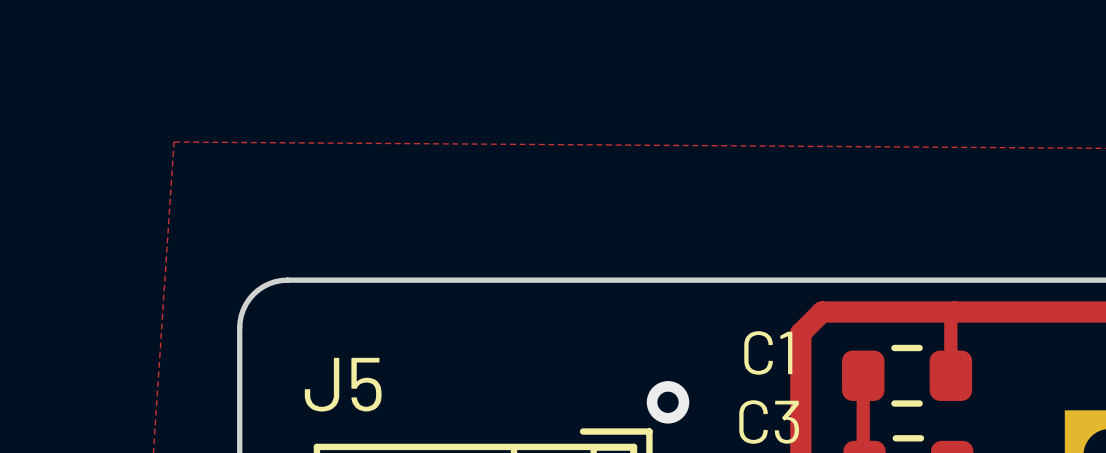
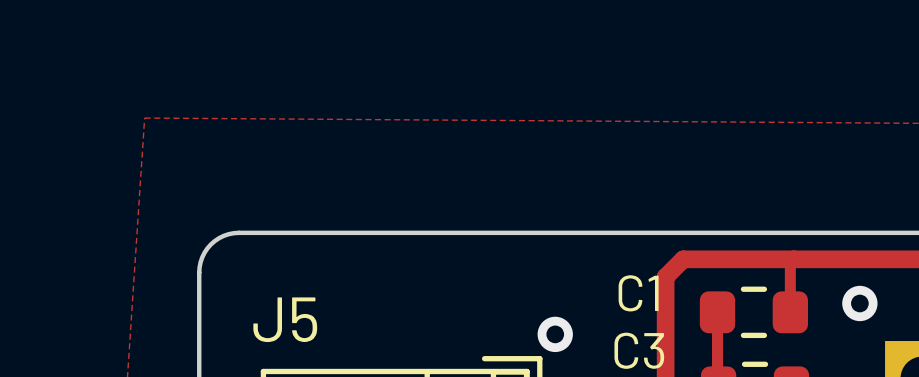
via: none -> (859, 303)

